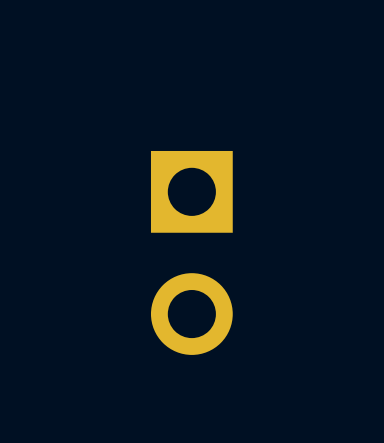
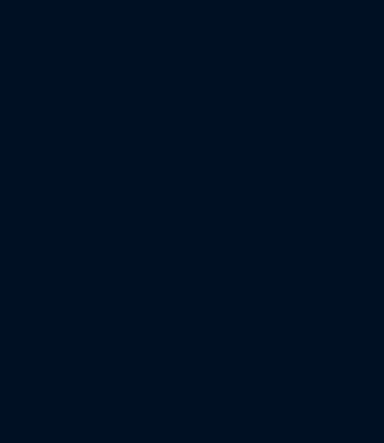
part: (191, 252) -> none

